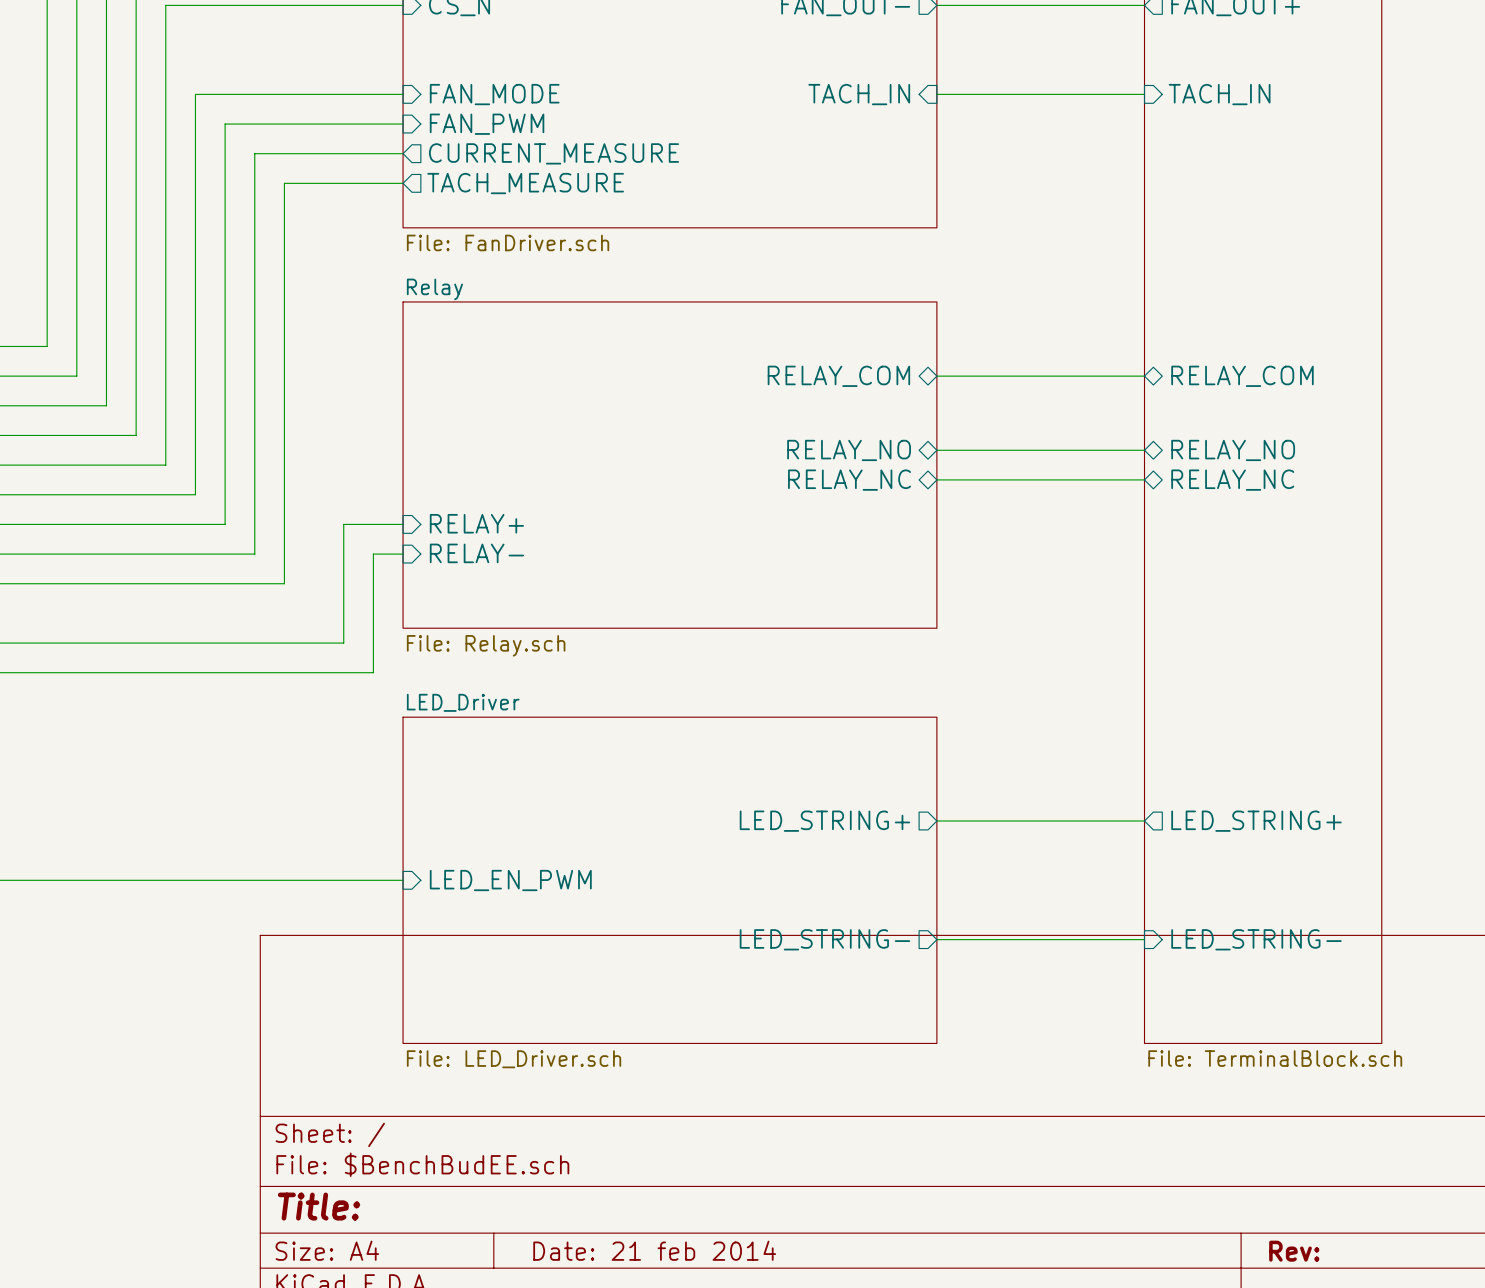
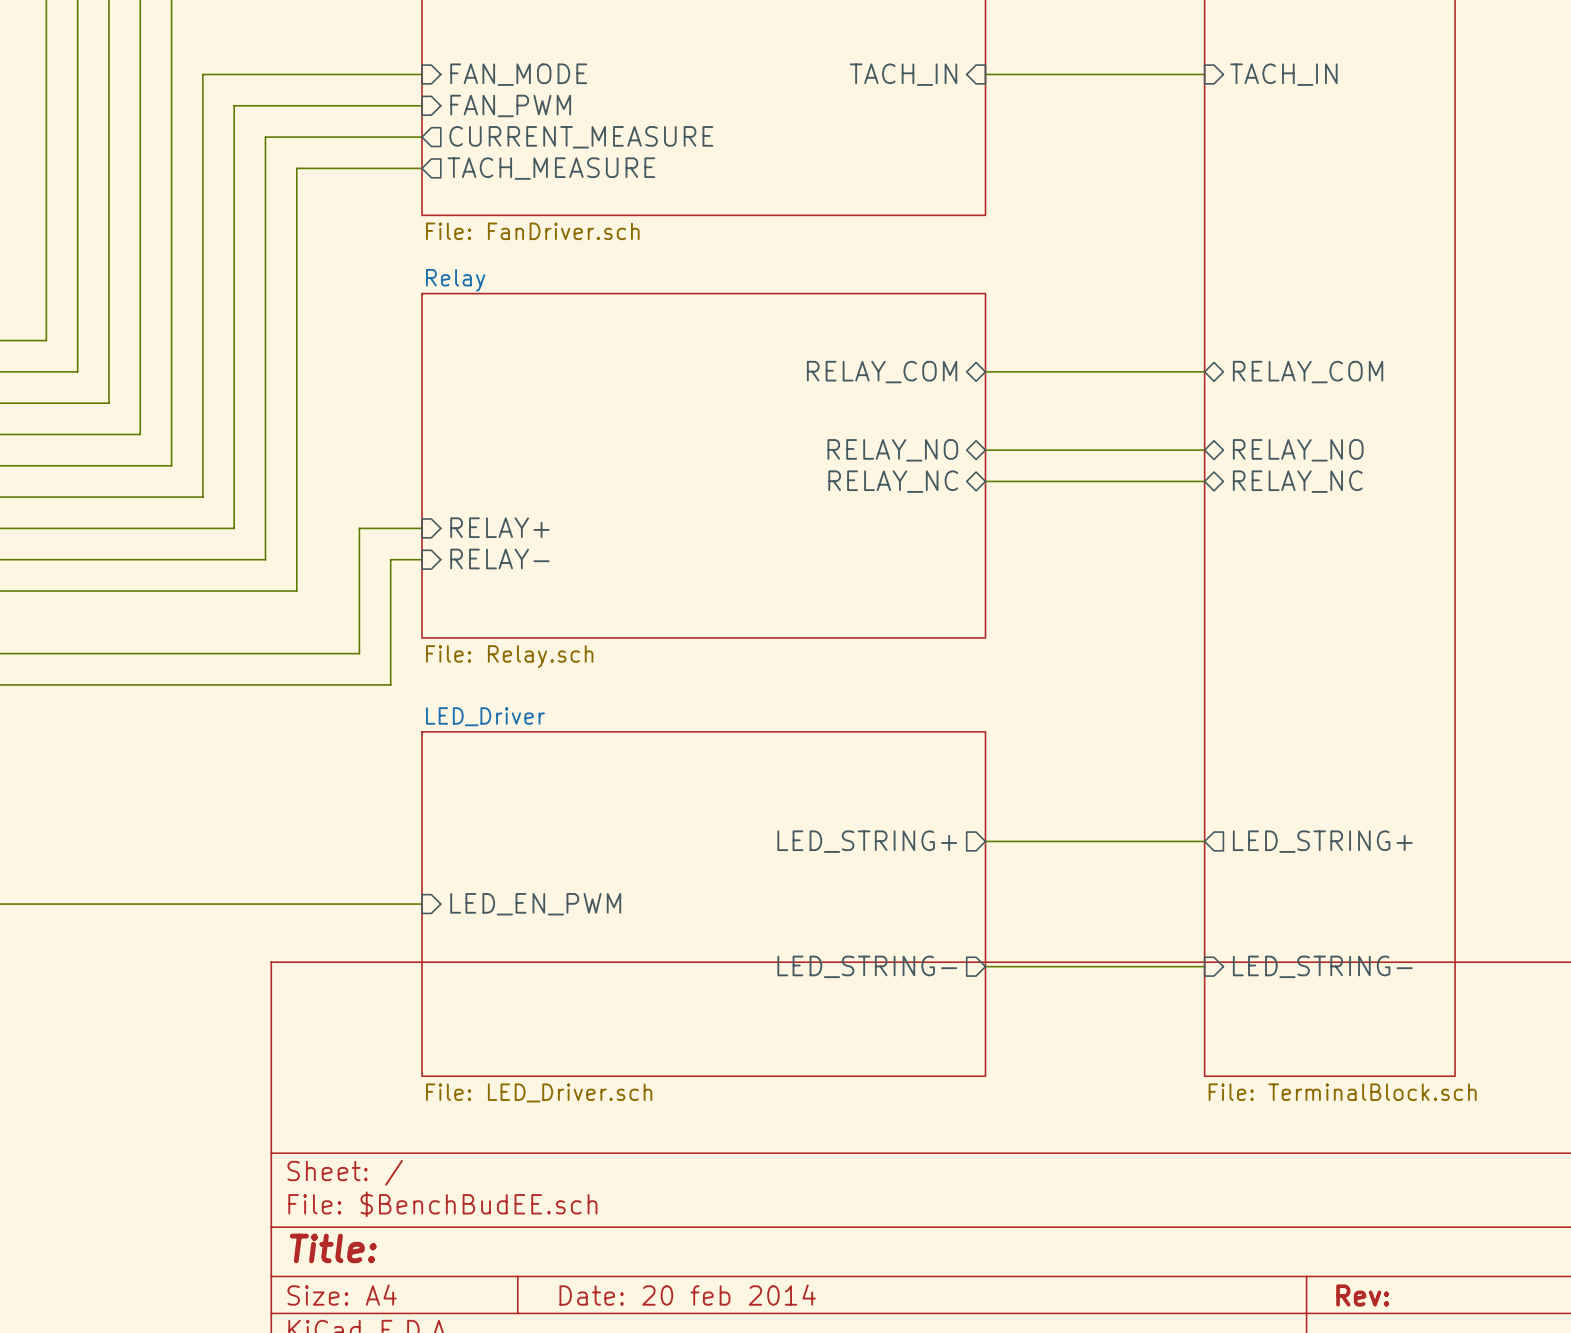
title block: Date: 21 feb 2014 (654, 1250) -> Date: 20 feb 2014 (687, 1295)

